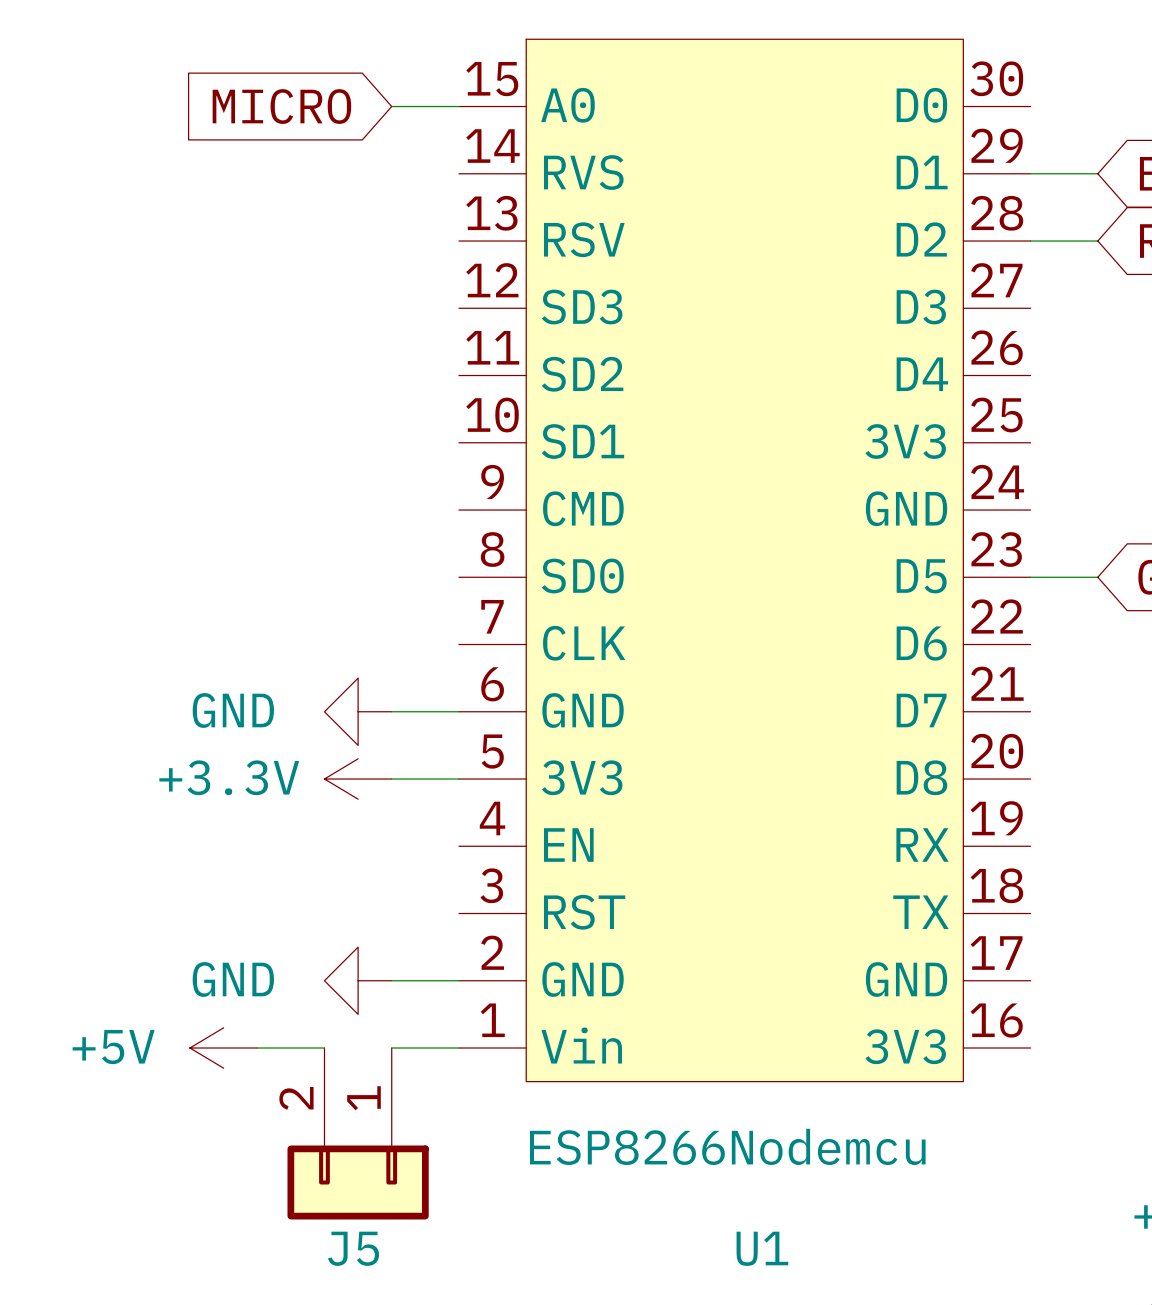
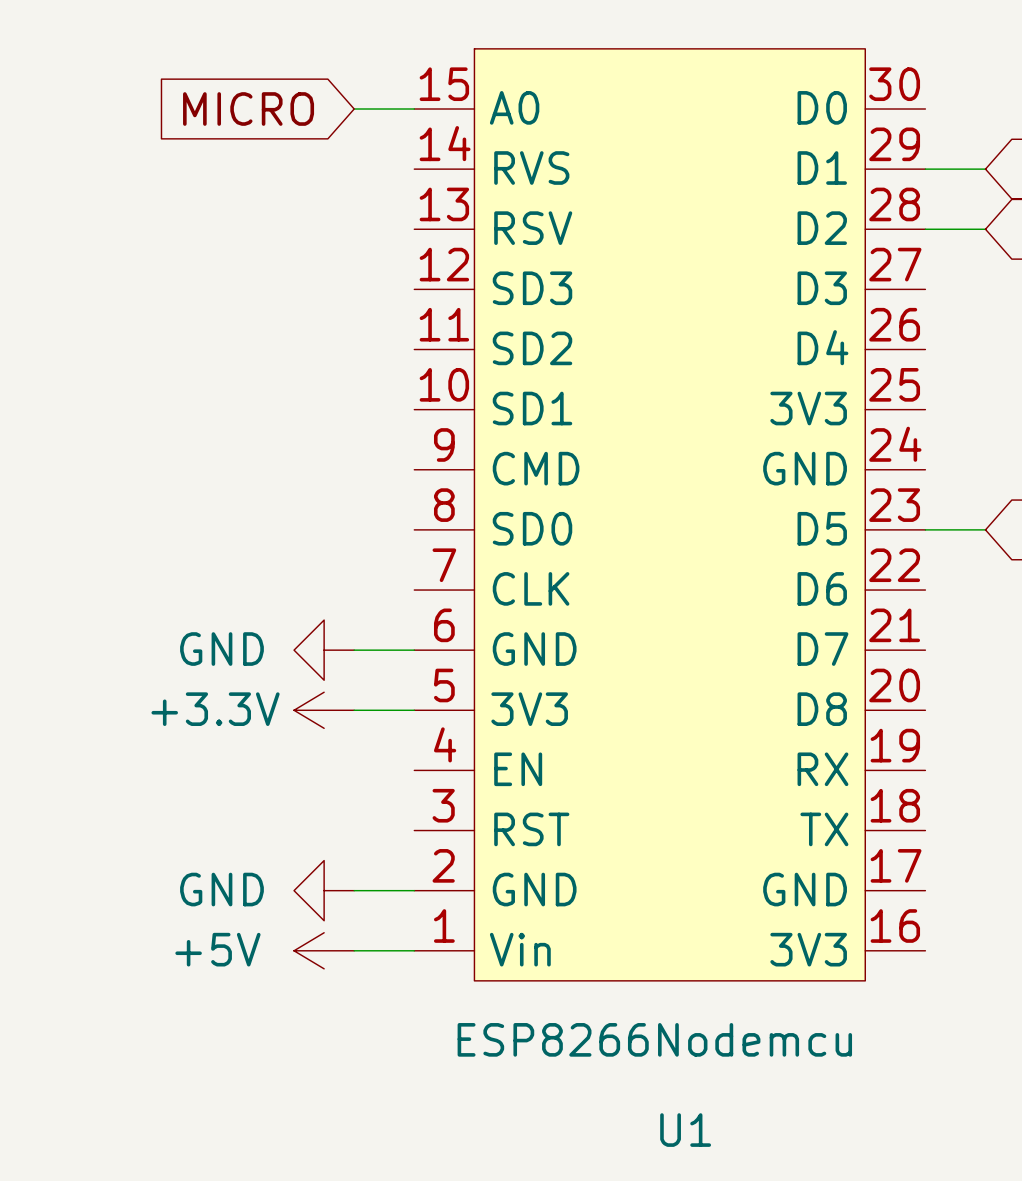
power symbol position: +5V (223, 1048) -> +5V (324, 950)
wire: (257, 1048) (324, 1048) -> none
J5: (358, 1133) -> none

